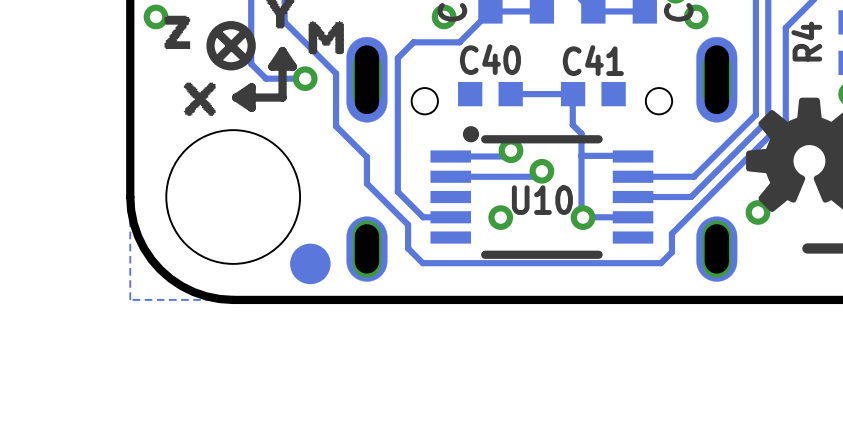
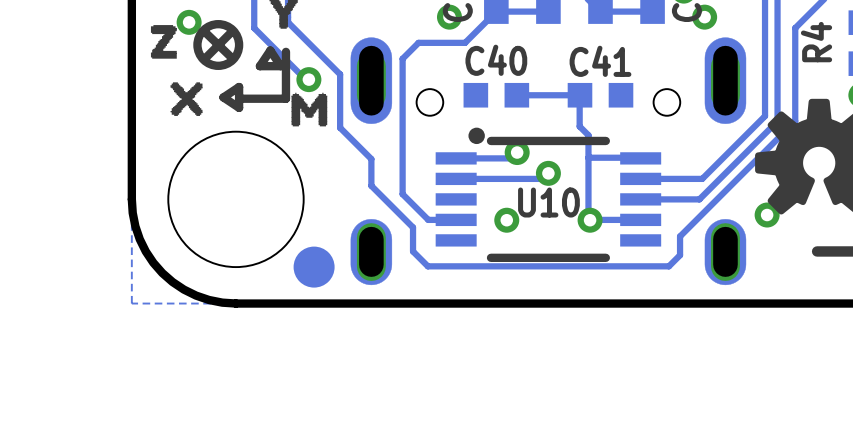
via position: (156, 16) -> (189, 22)
track: (251, 27) (251, 63) (266, 78) (302, 78) -> (254, 28) (305, 79)
drawing position: (177, 32) -> (163, 41)
line: (218, 33) (244, 58) -> (205, 32) (231, 57)
line: (243, 33) (218, 58) -> (230, 32) (205, 57)
drawing position: (326, 37) -> (309, 109)
drawing position: (231, 45) -> (218, 45)
line: (282, 51) (272, 66) (292, 66) (282, 51) -> (270, 50) (259, 66) (280, 66) (270, 50)
line: (251, 87) (251, 107) (236, 97) (251, 87) -> (239, 87) (239, 107) (223, 97) (239, 87)
drawing position: (199, 99) -> (186, 99)

